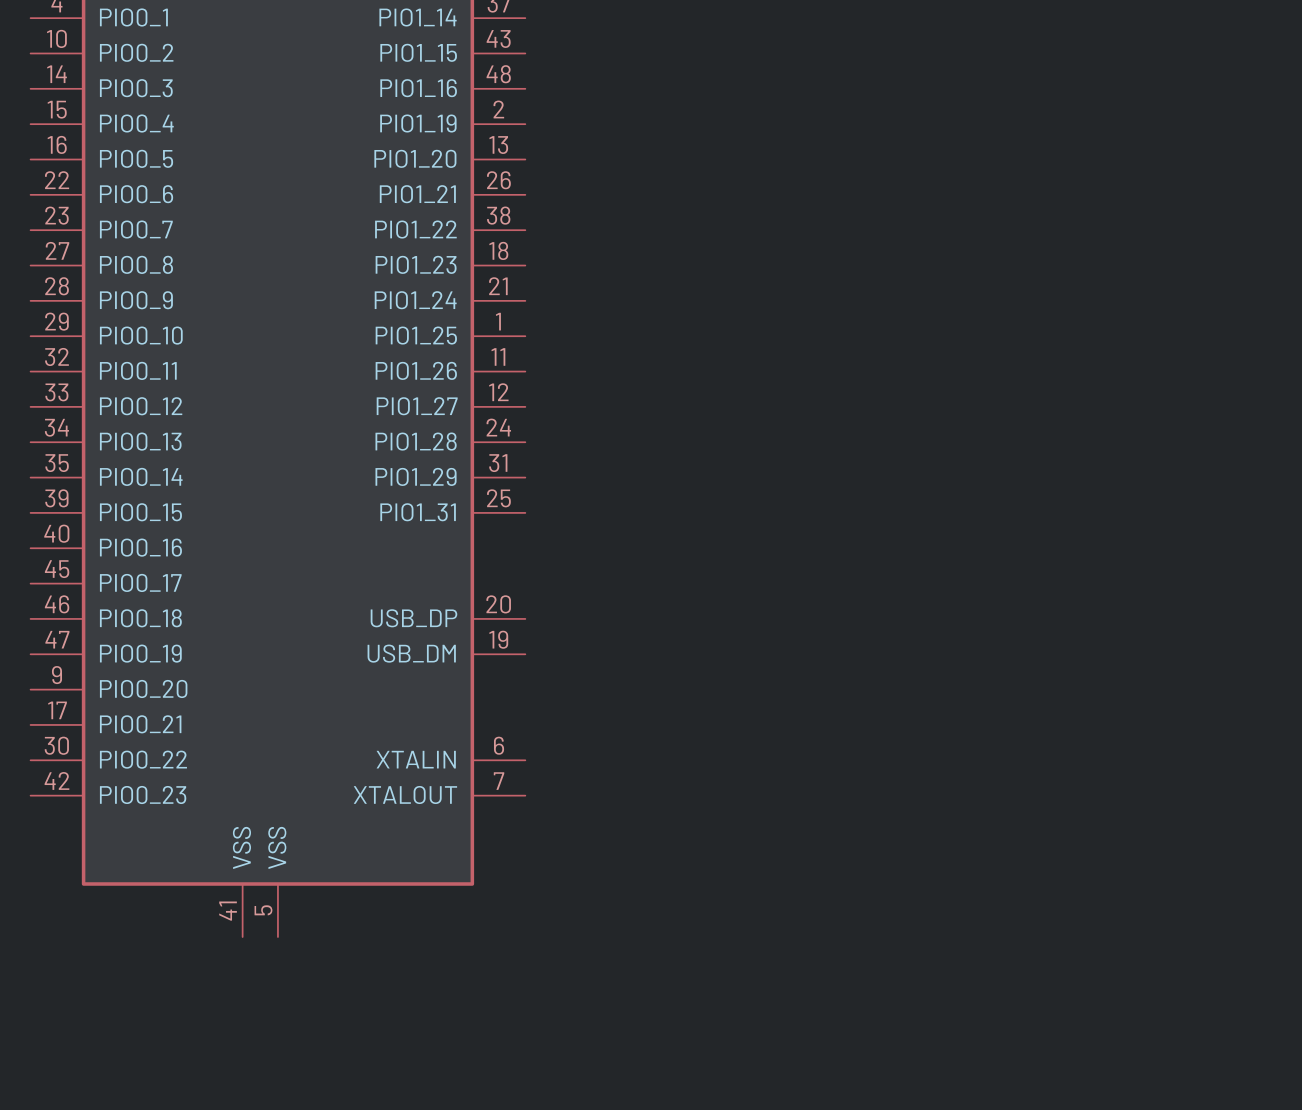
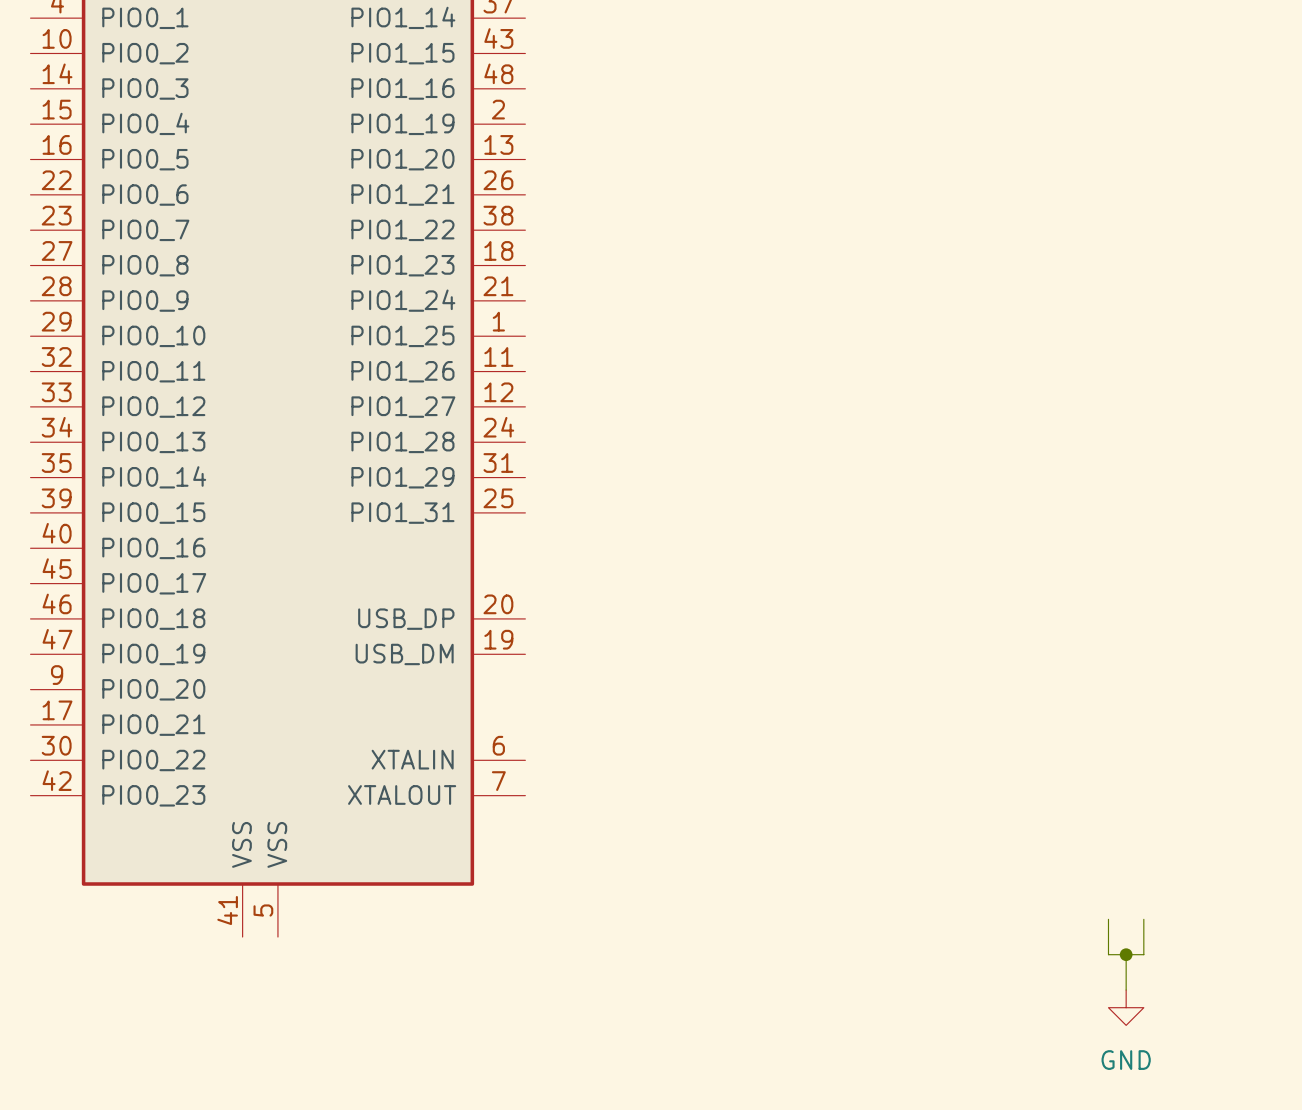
wire: none -> (1108, 919) (1108, 954) (1143, 954) (1143, 919)
wire: none -> (1126, 954) (1126, 990)
junction: none -> (1126, 954)
power symbol: none -> GND (1126, 1007)

